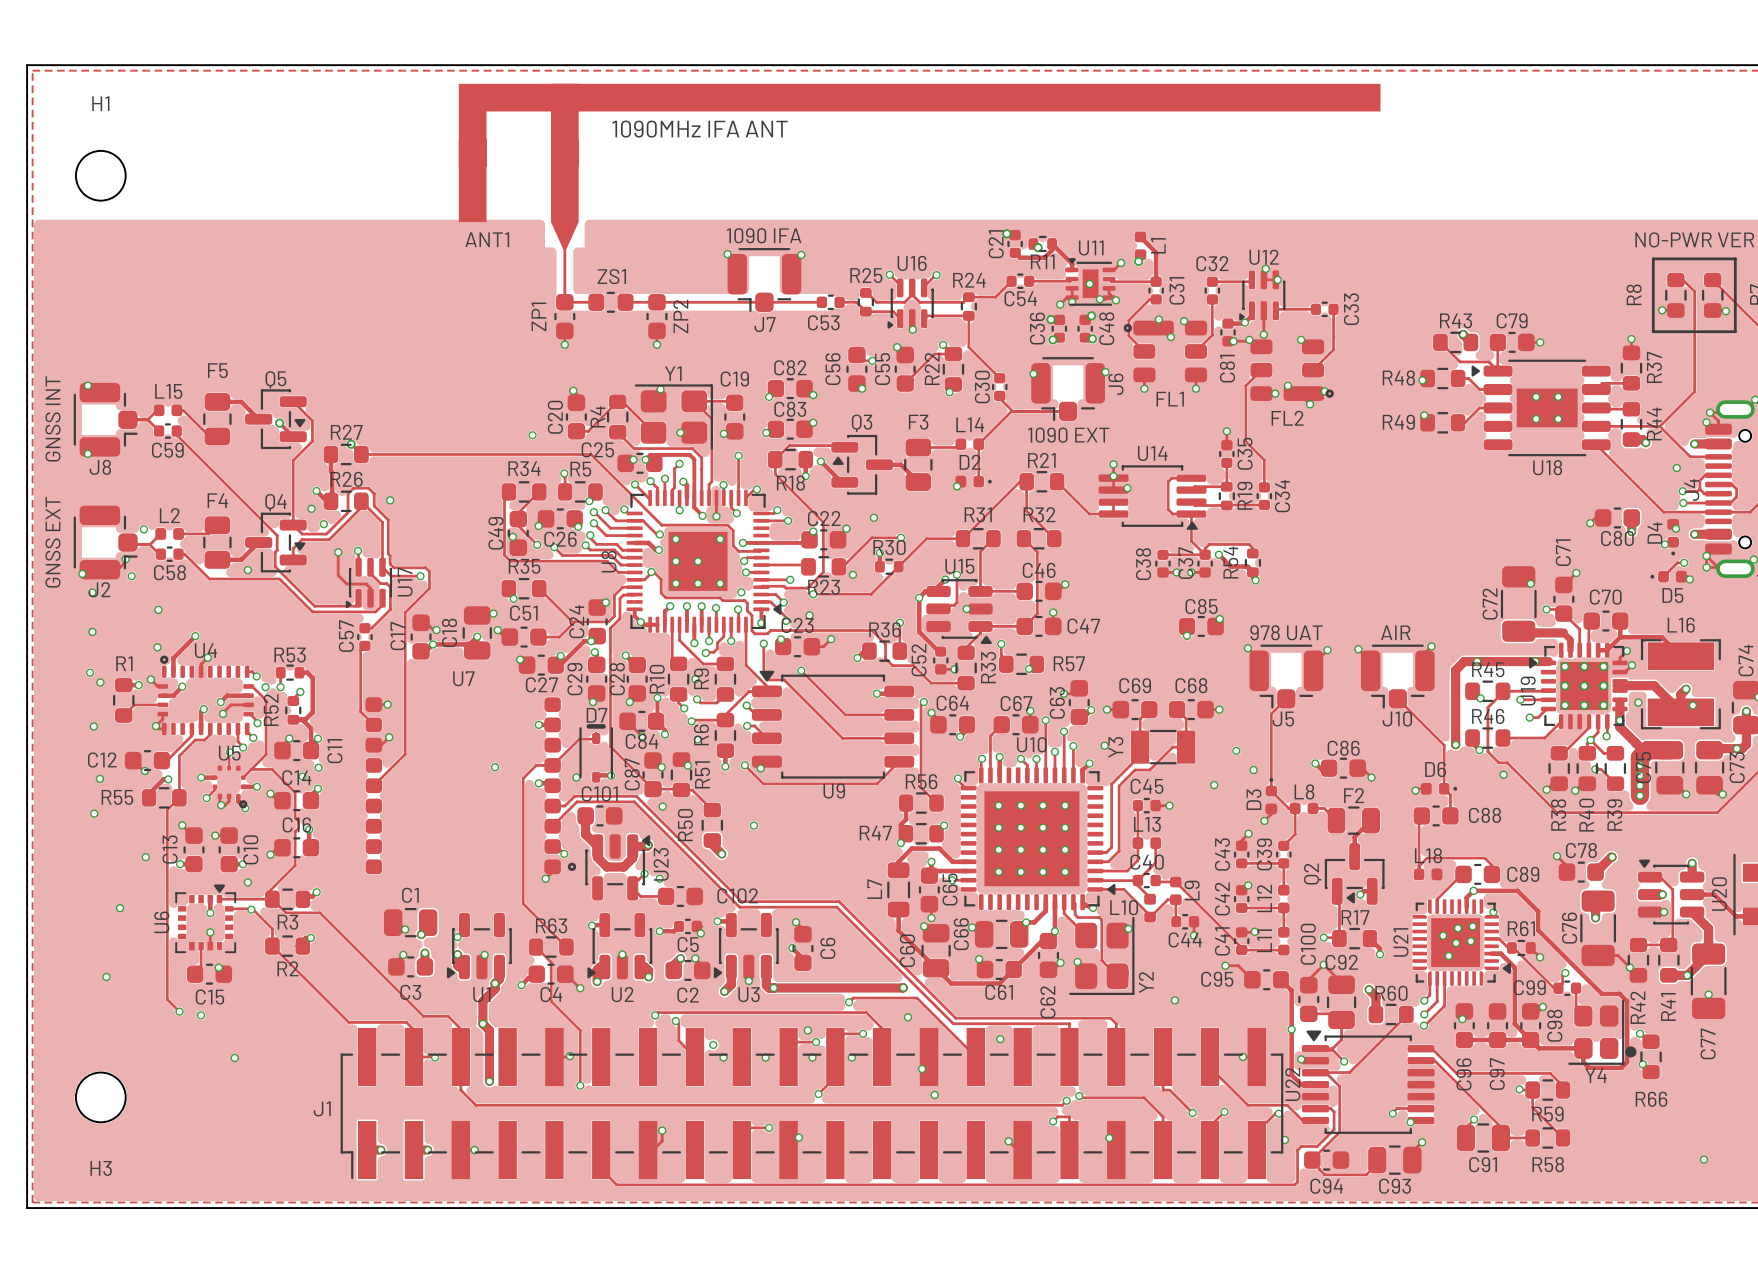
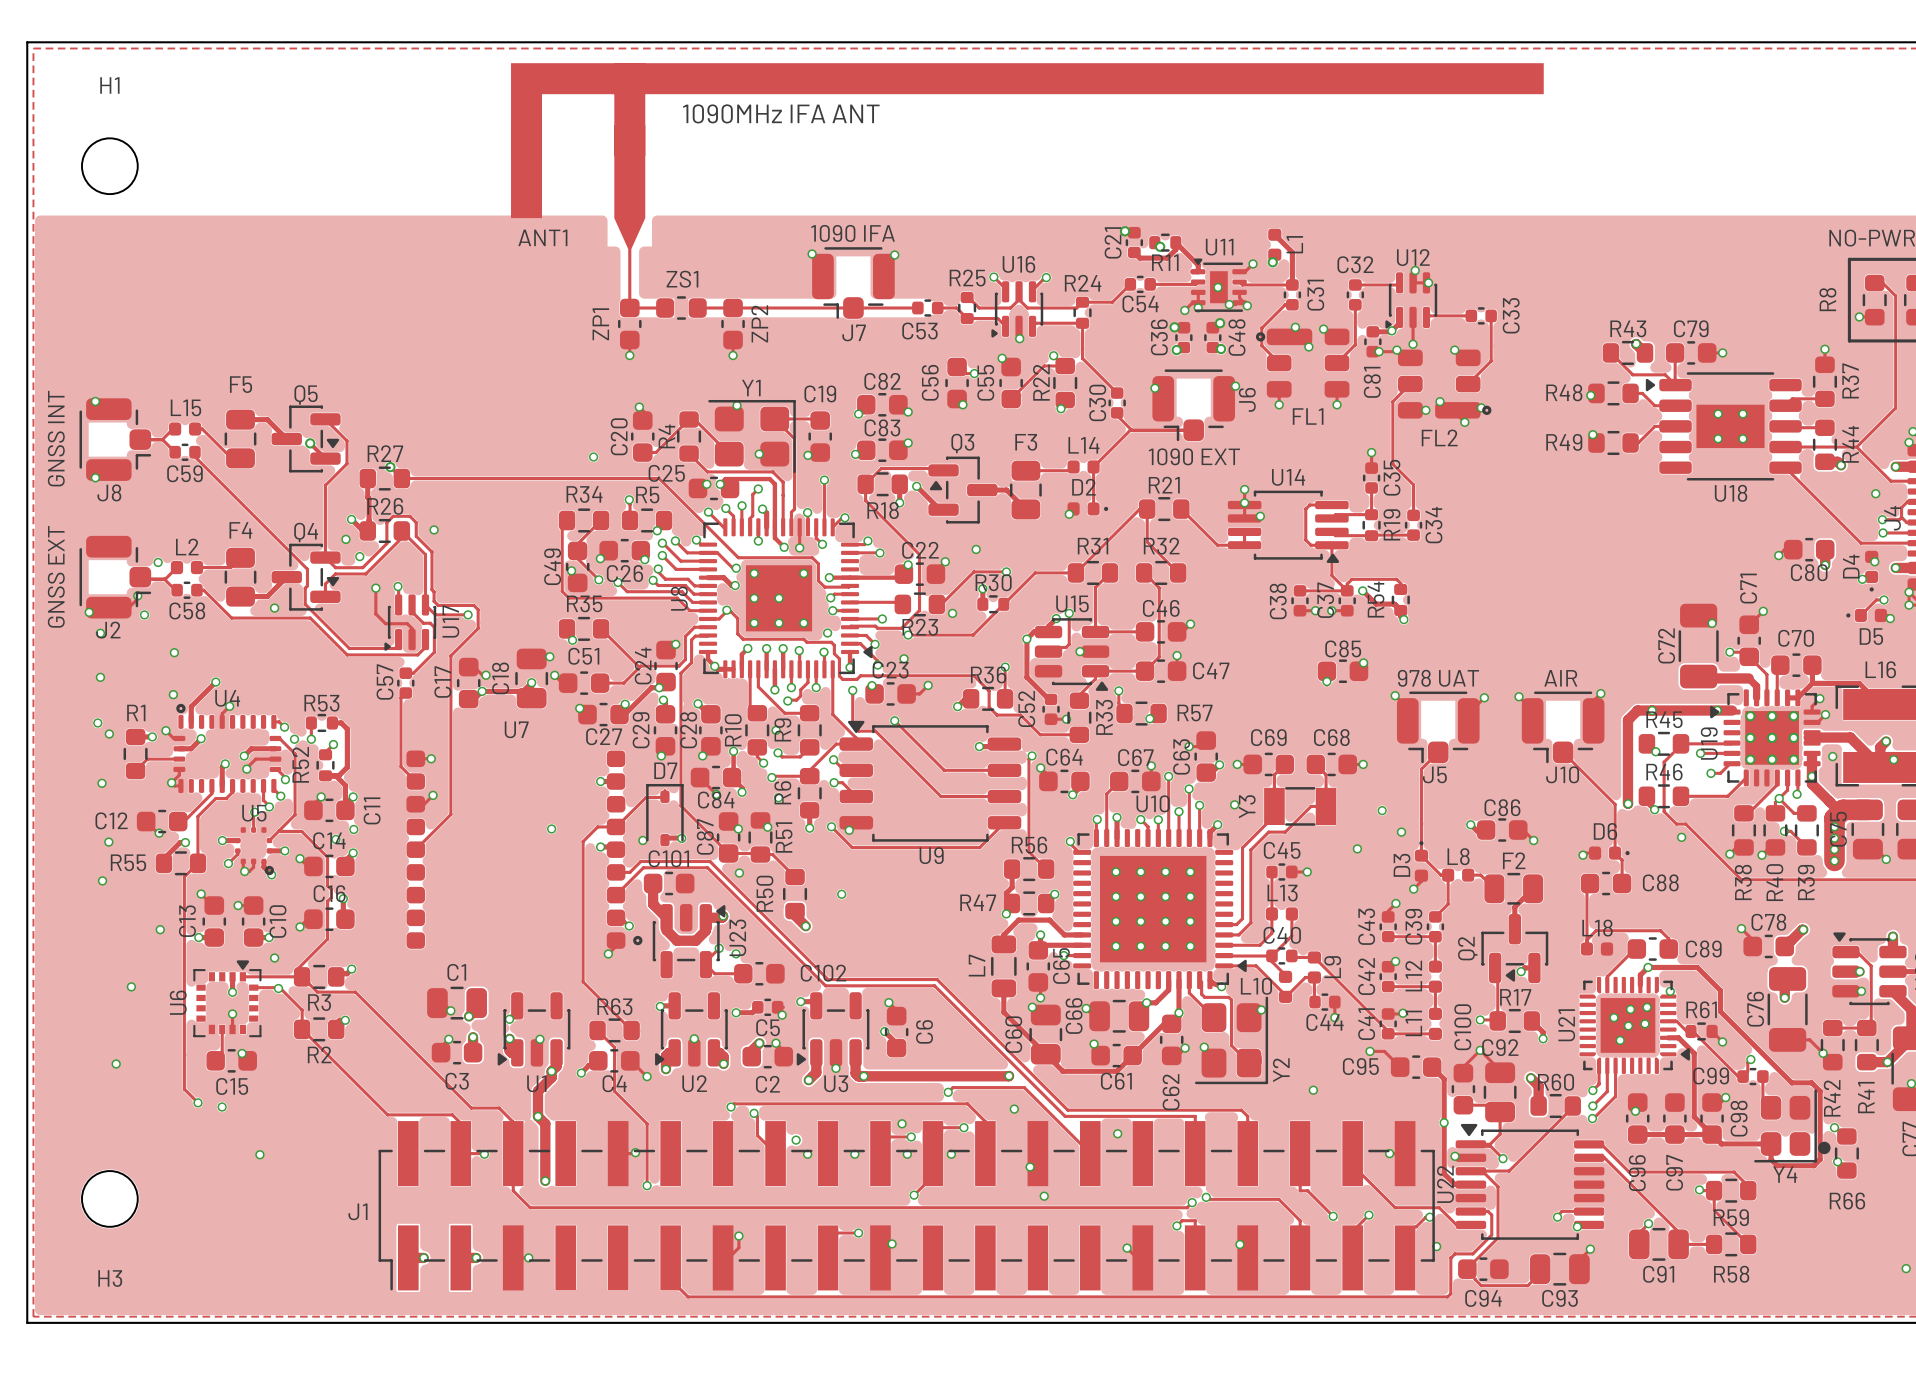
line: (588, 726) (603, 726) -> none
D7 footprint: [579, 727, 613, 783] -> [646, 783, 684, 847]

